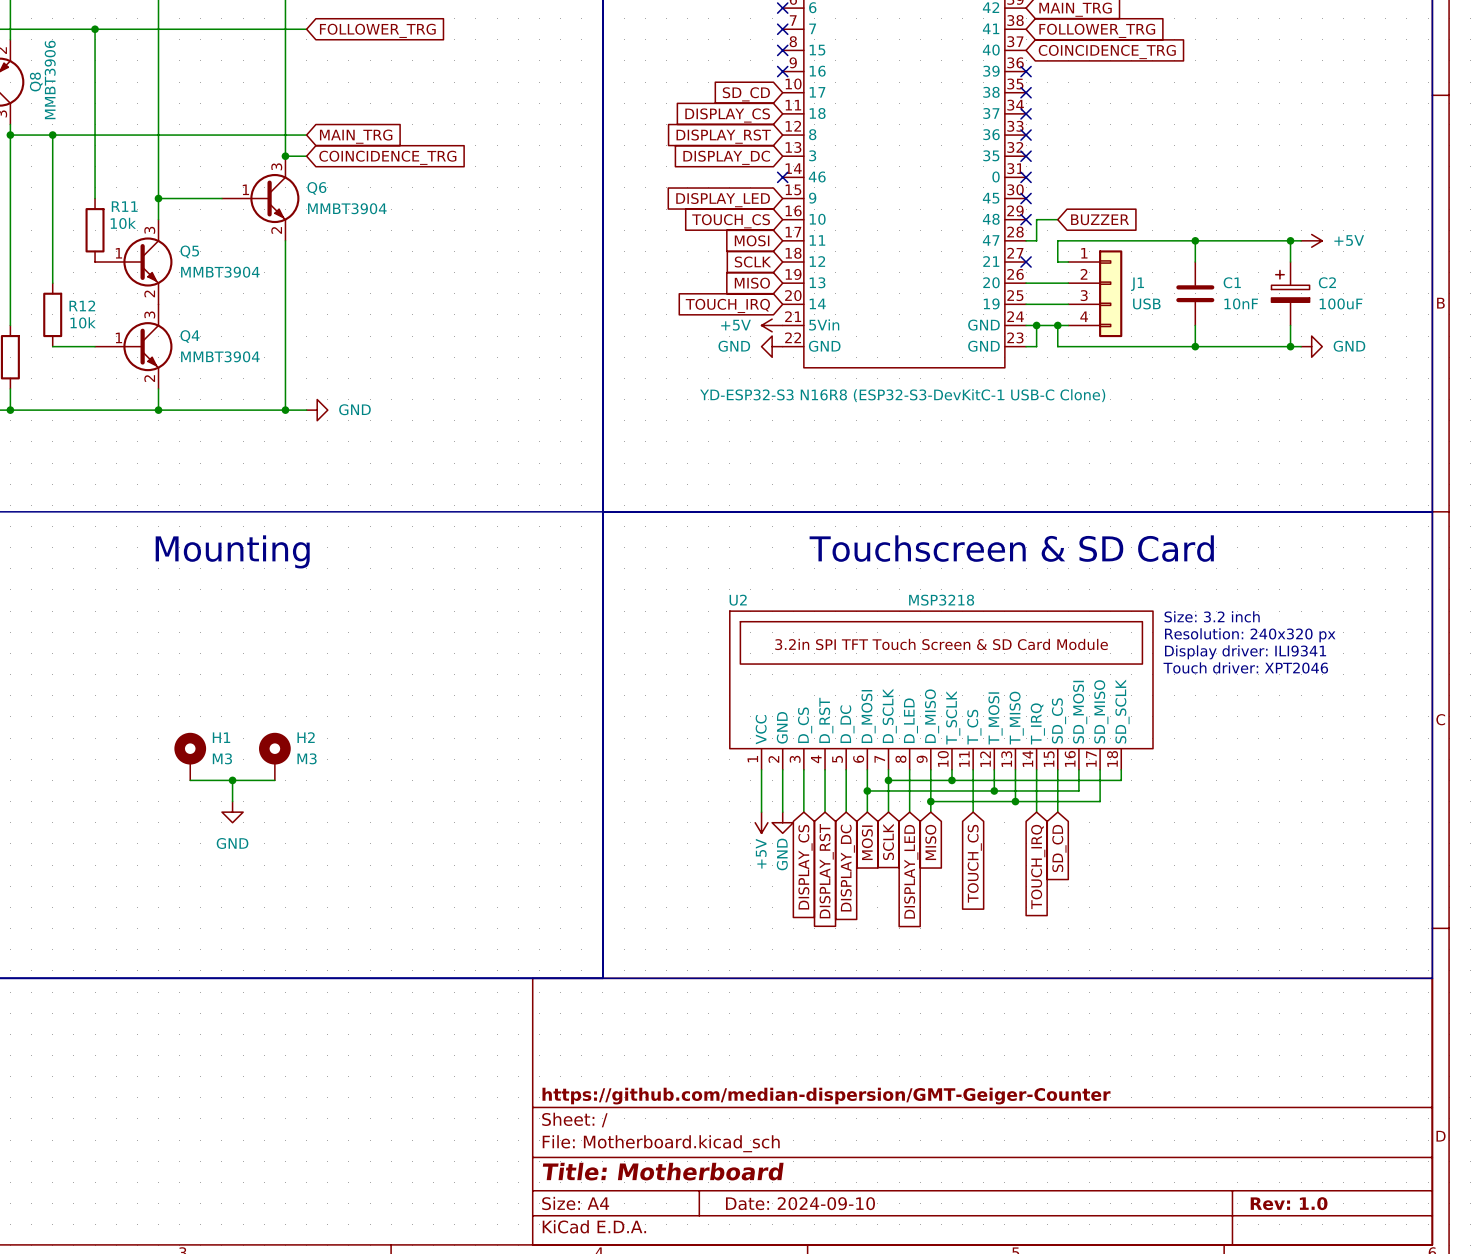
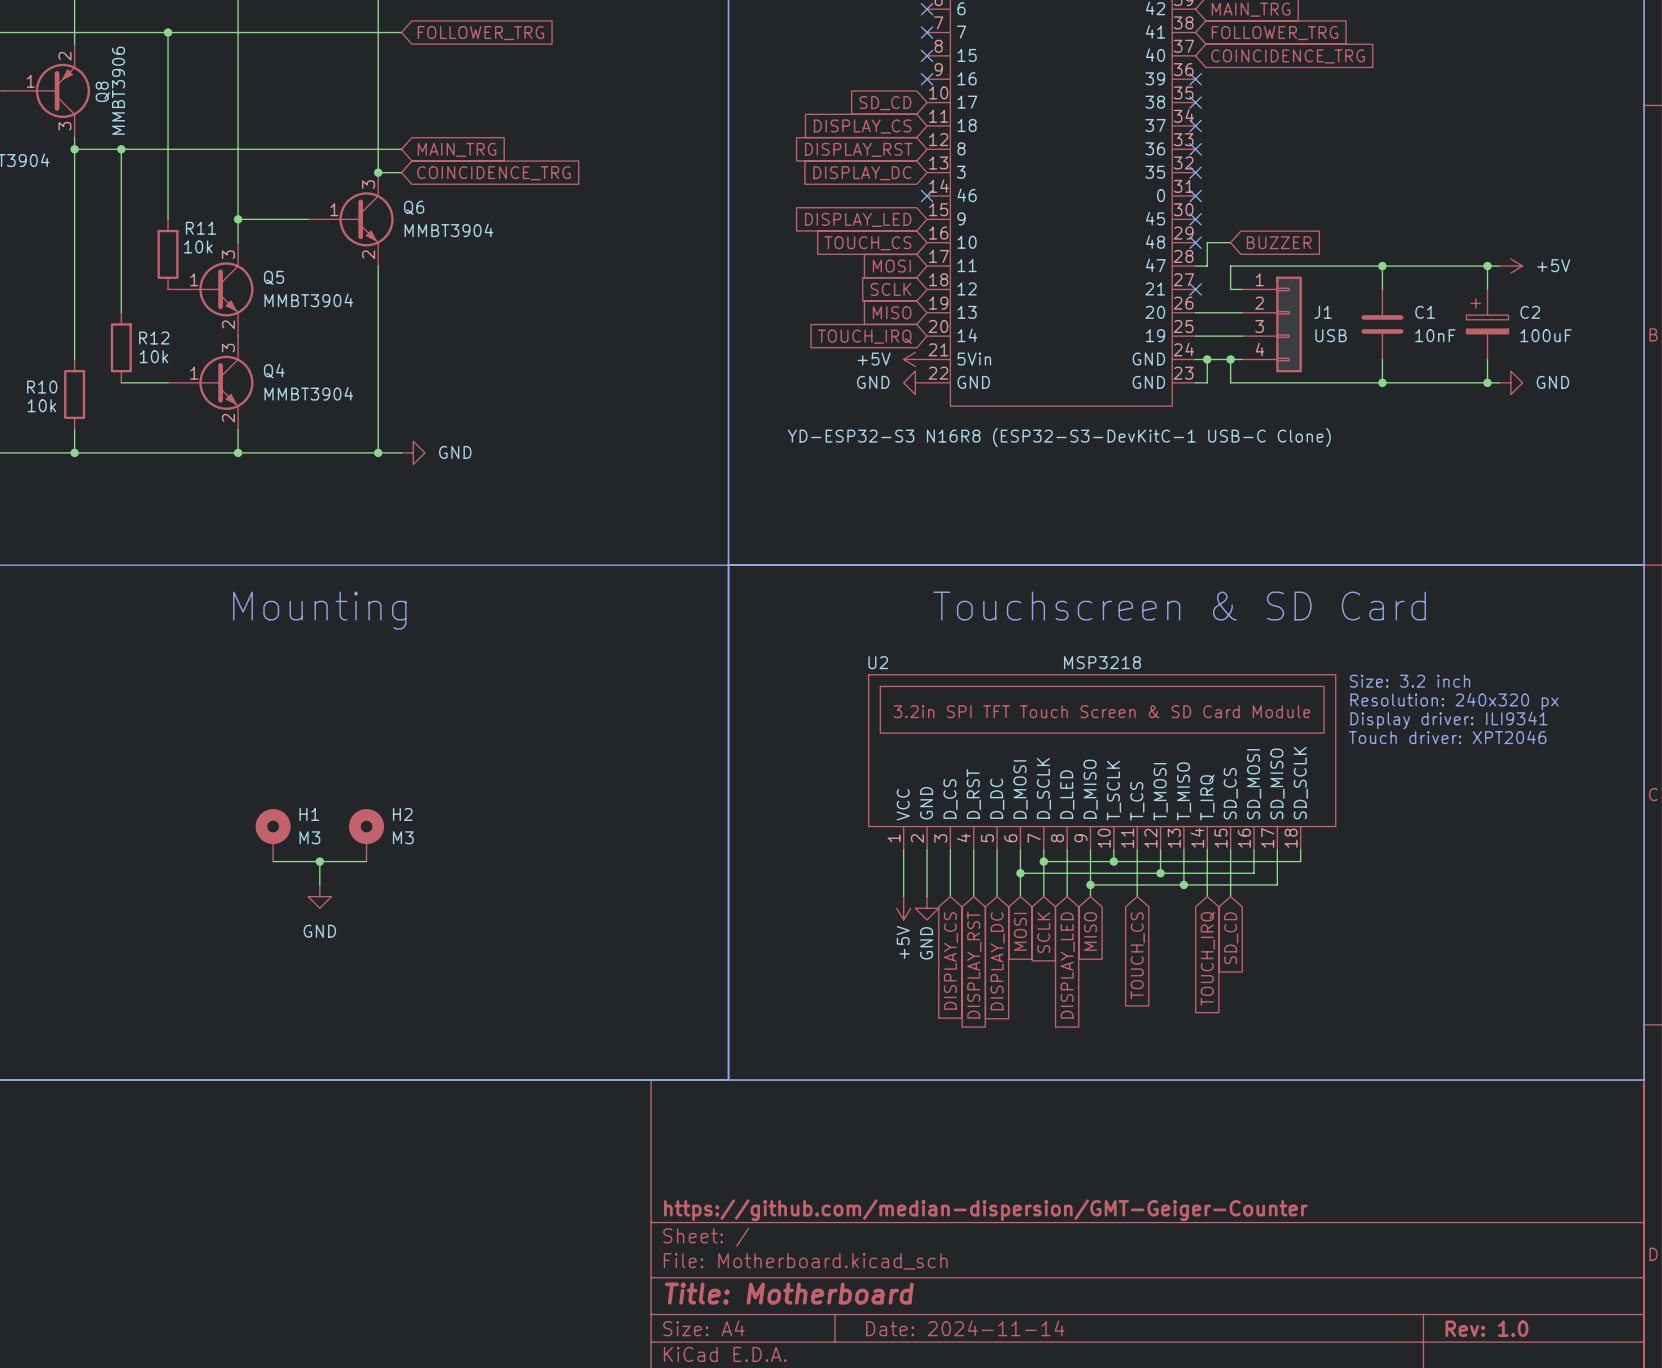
title block: Date: 2024-09-10 (800, 1203) -> Date: 2024-11-14 (965, 1328)

